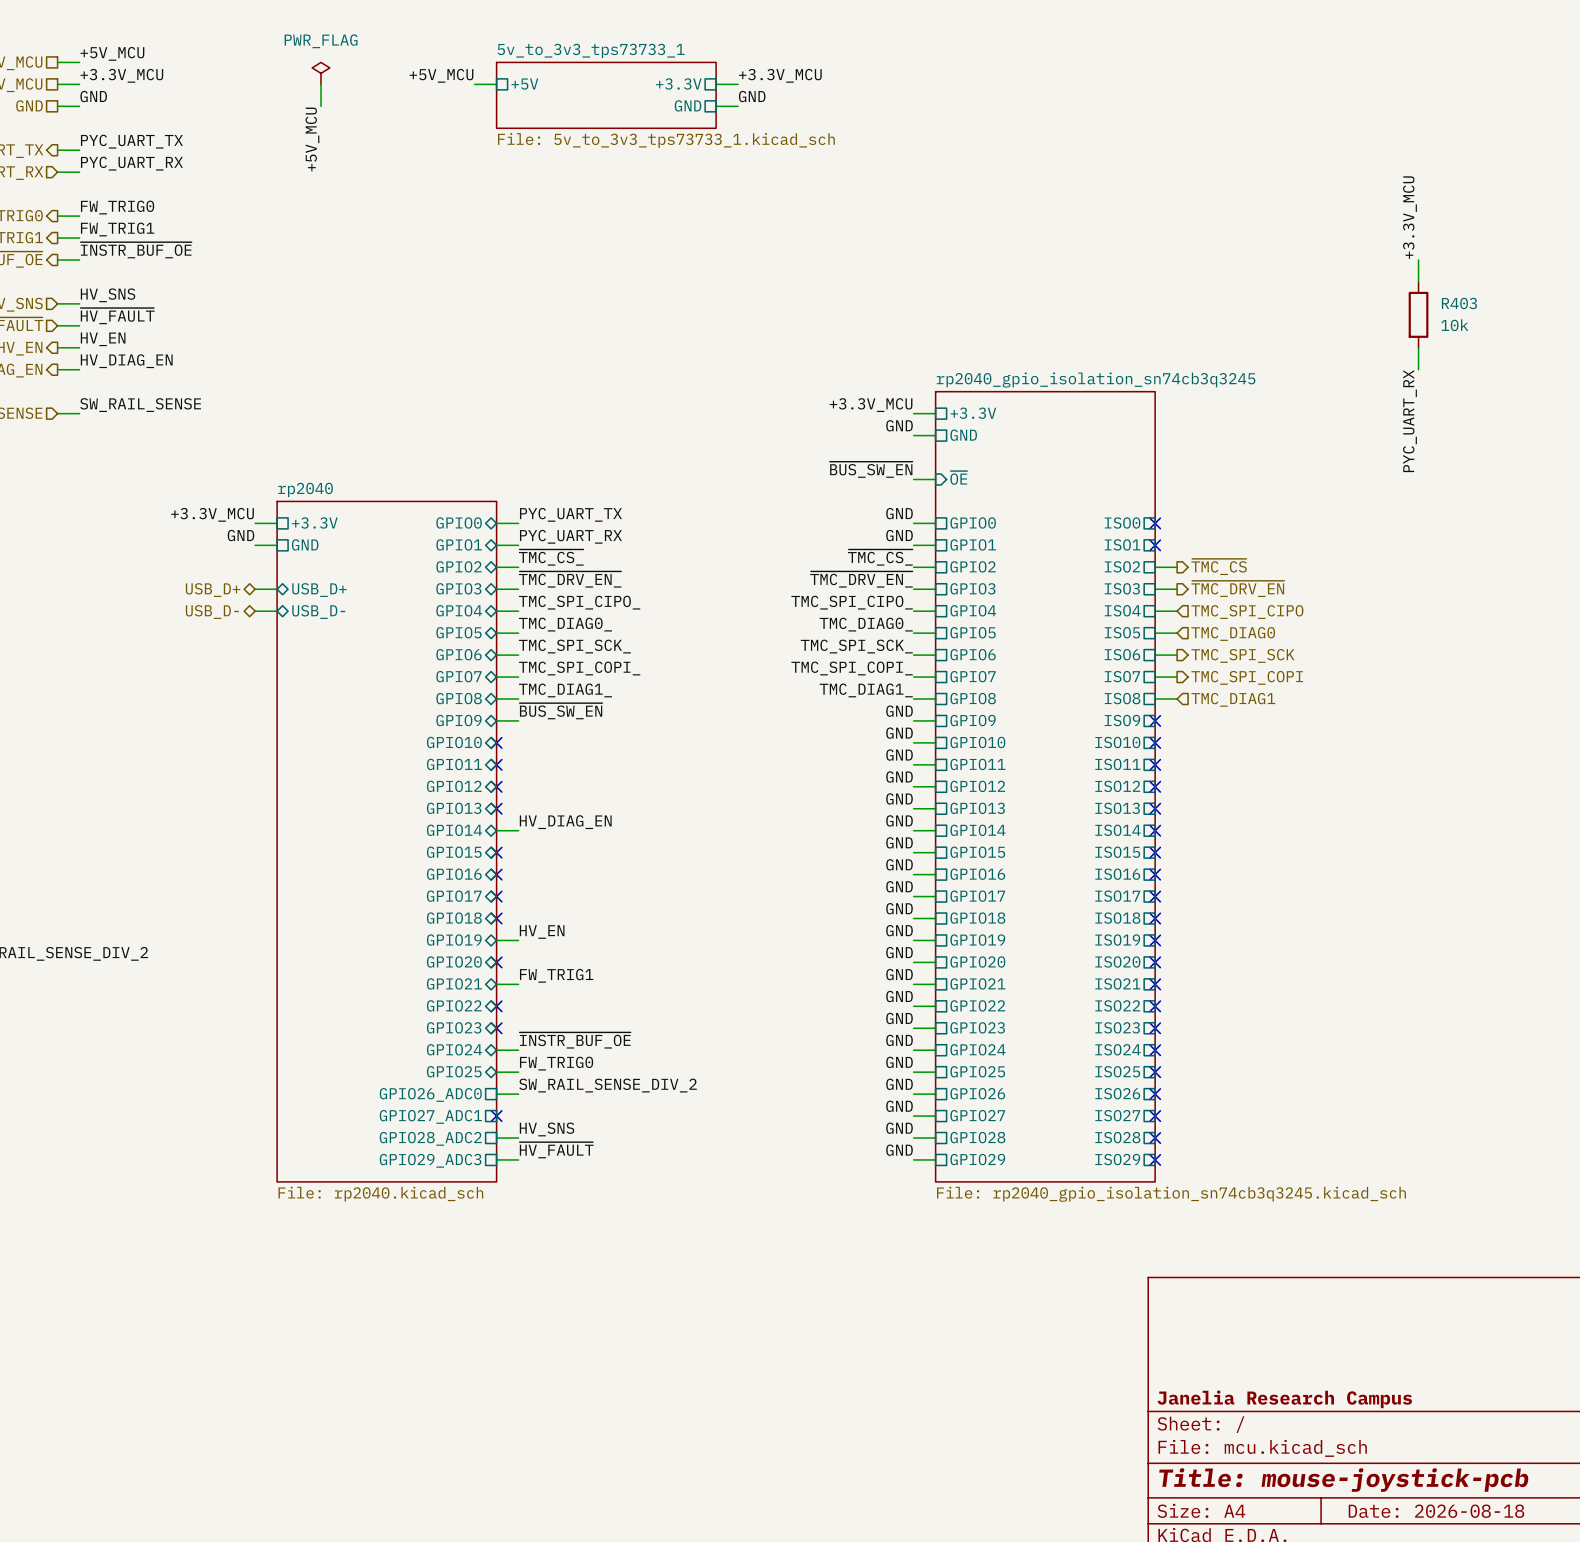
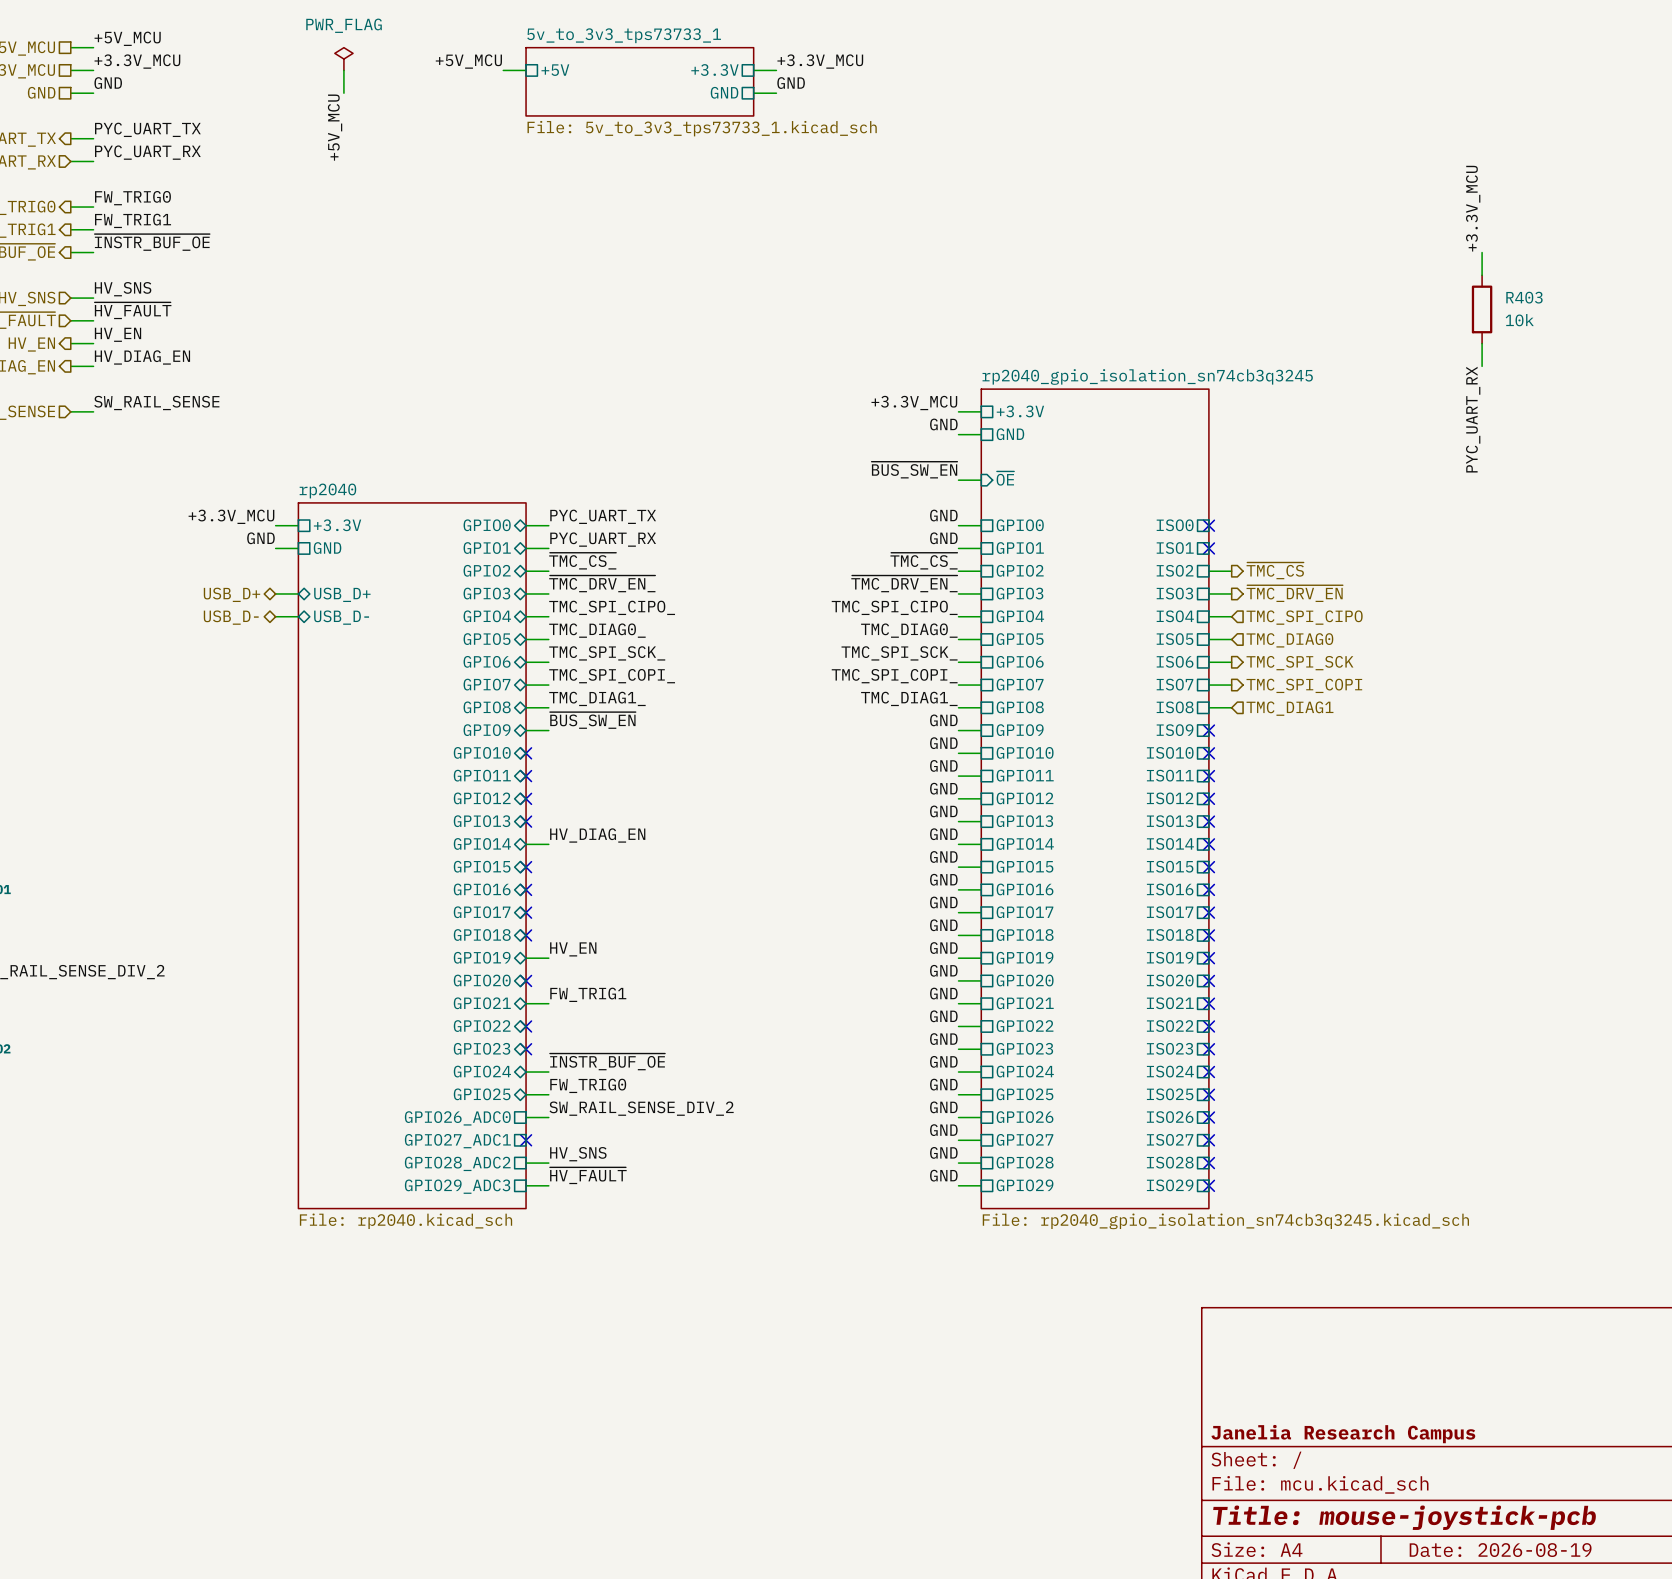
title block: Date: 2026-08-18 (1436, 1511) -> Date: 2026-08-19 (1500, 1550)

